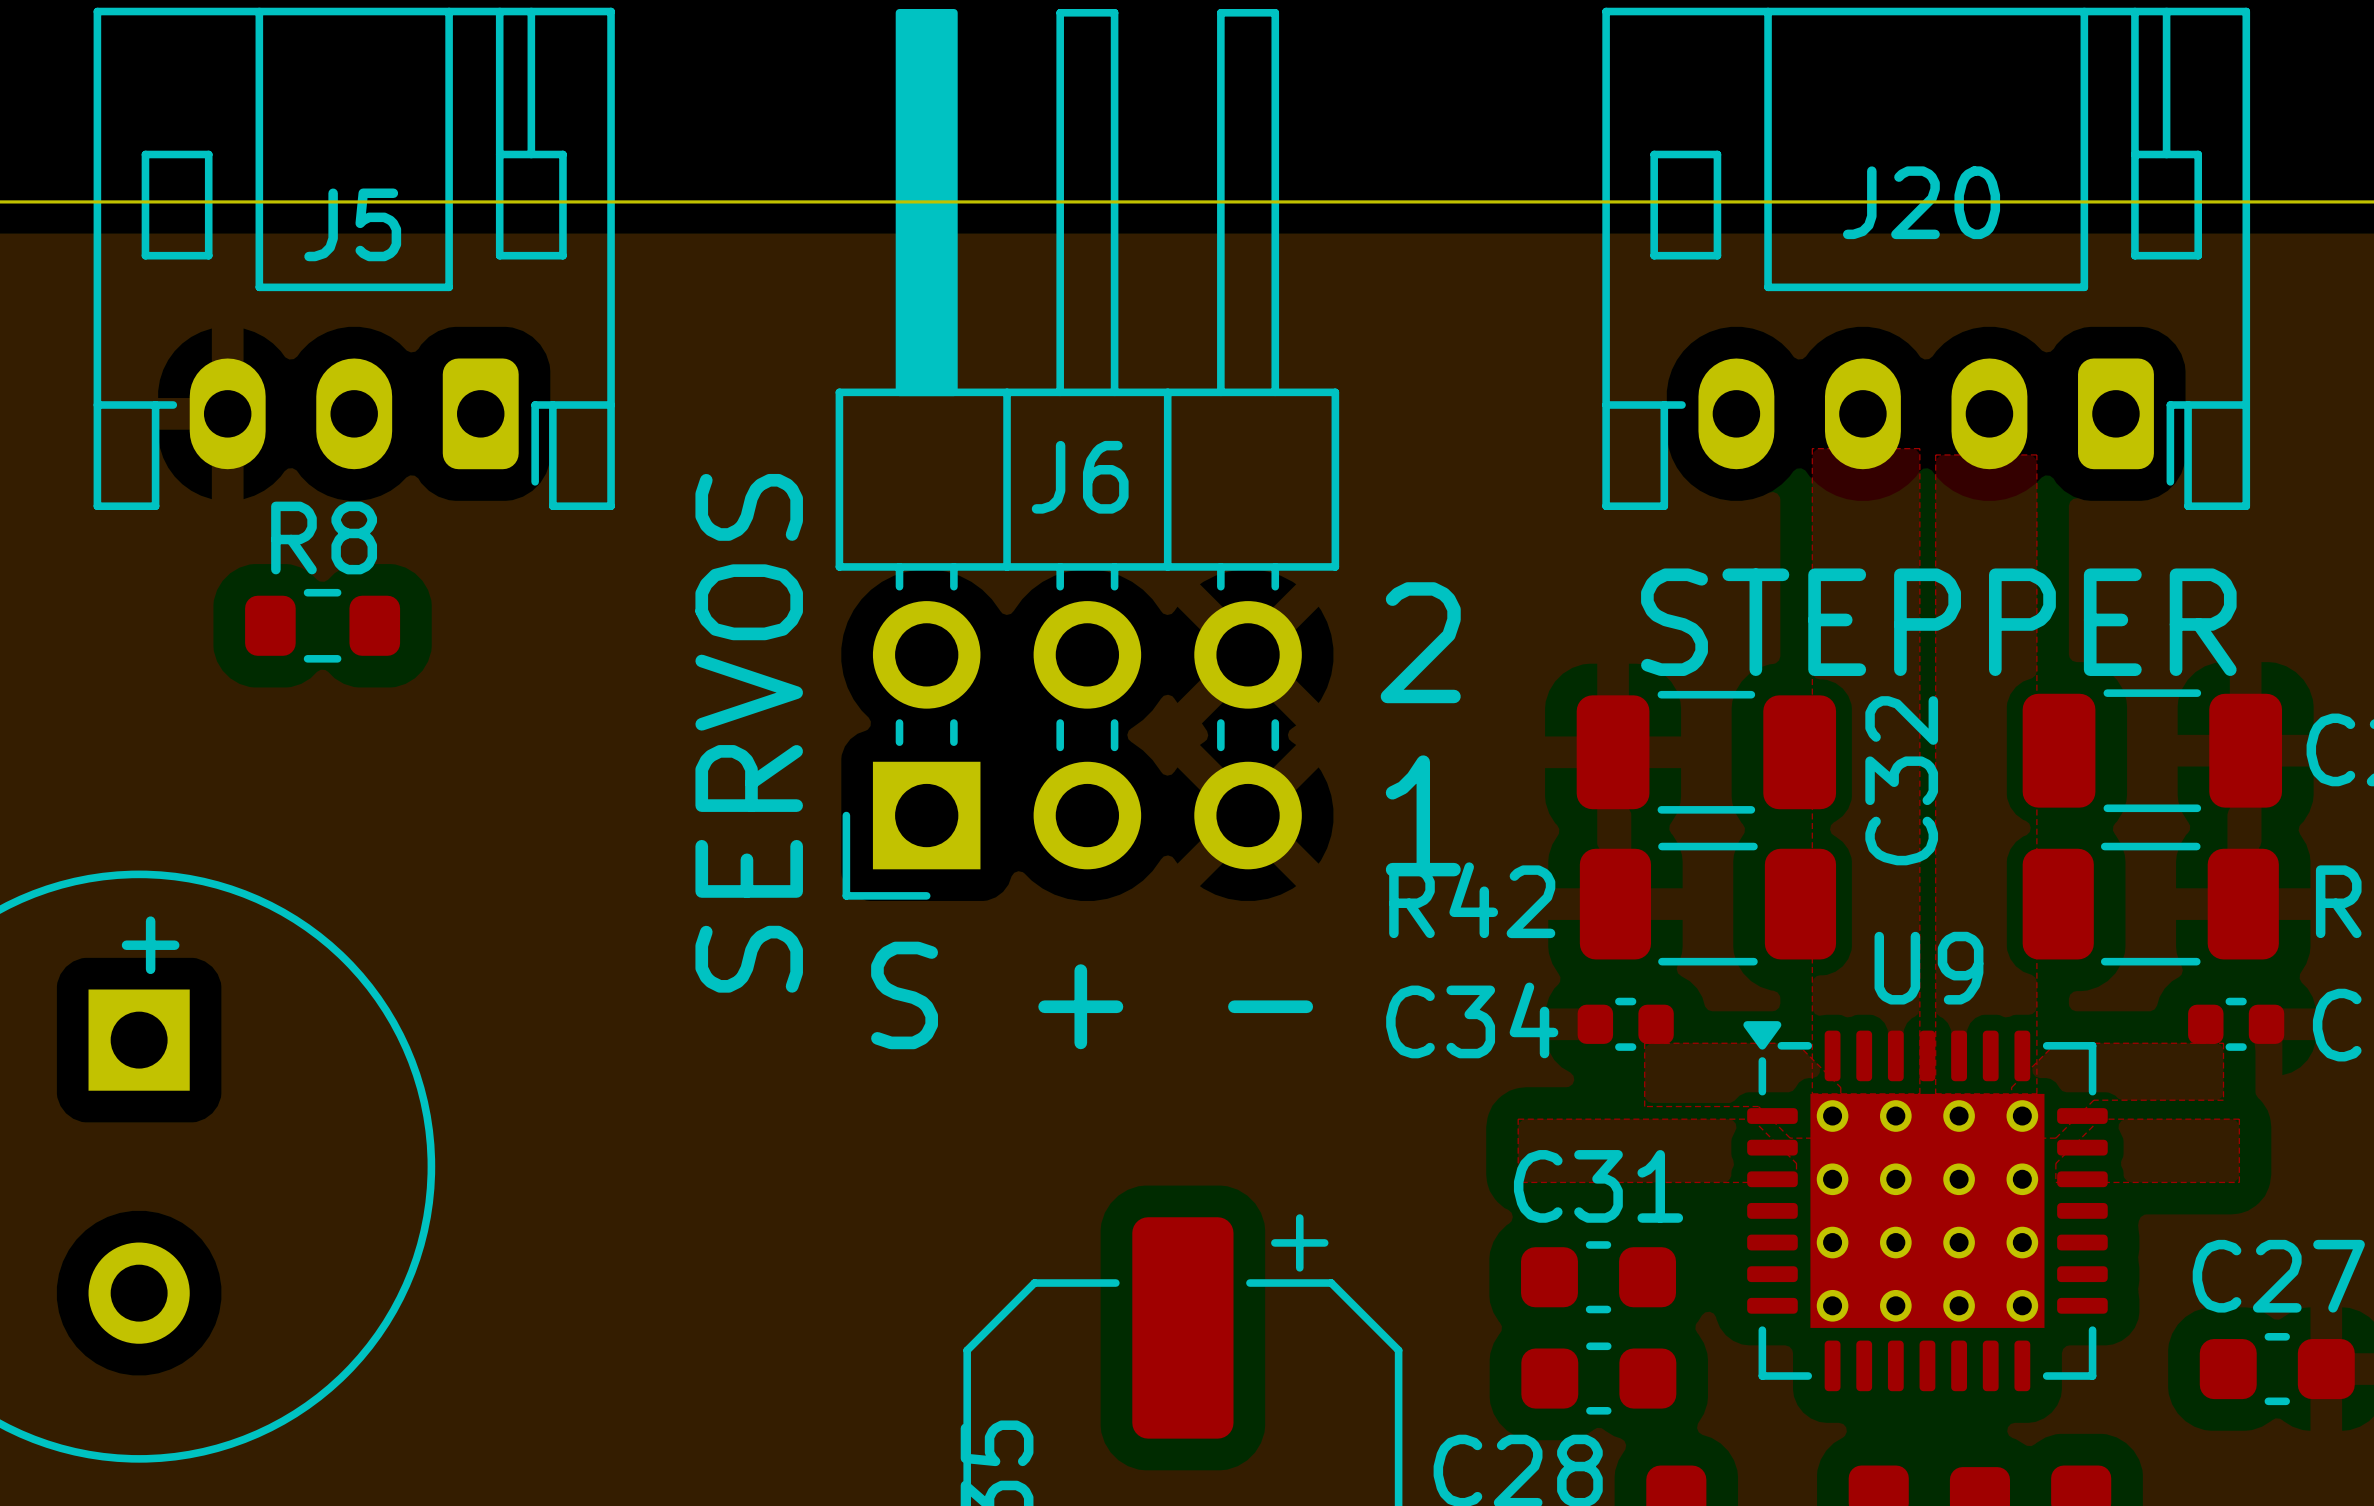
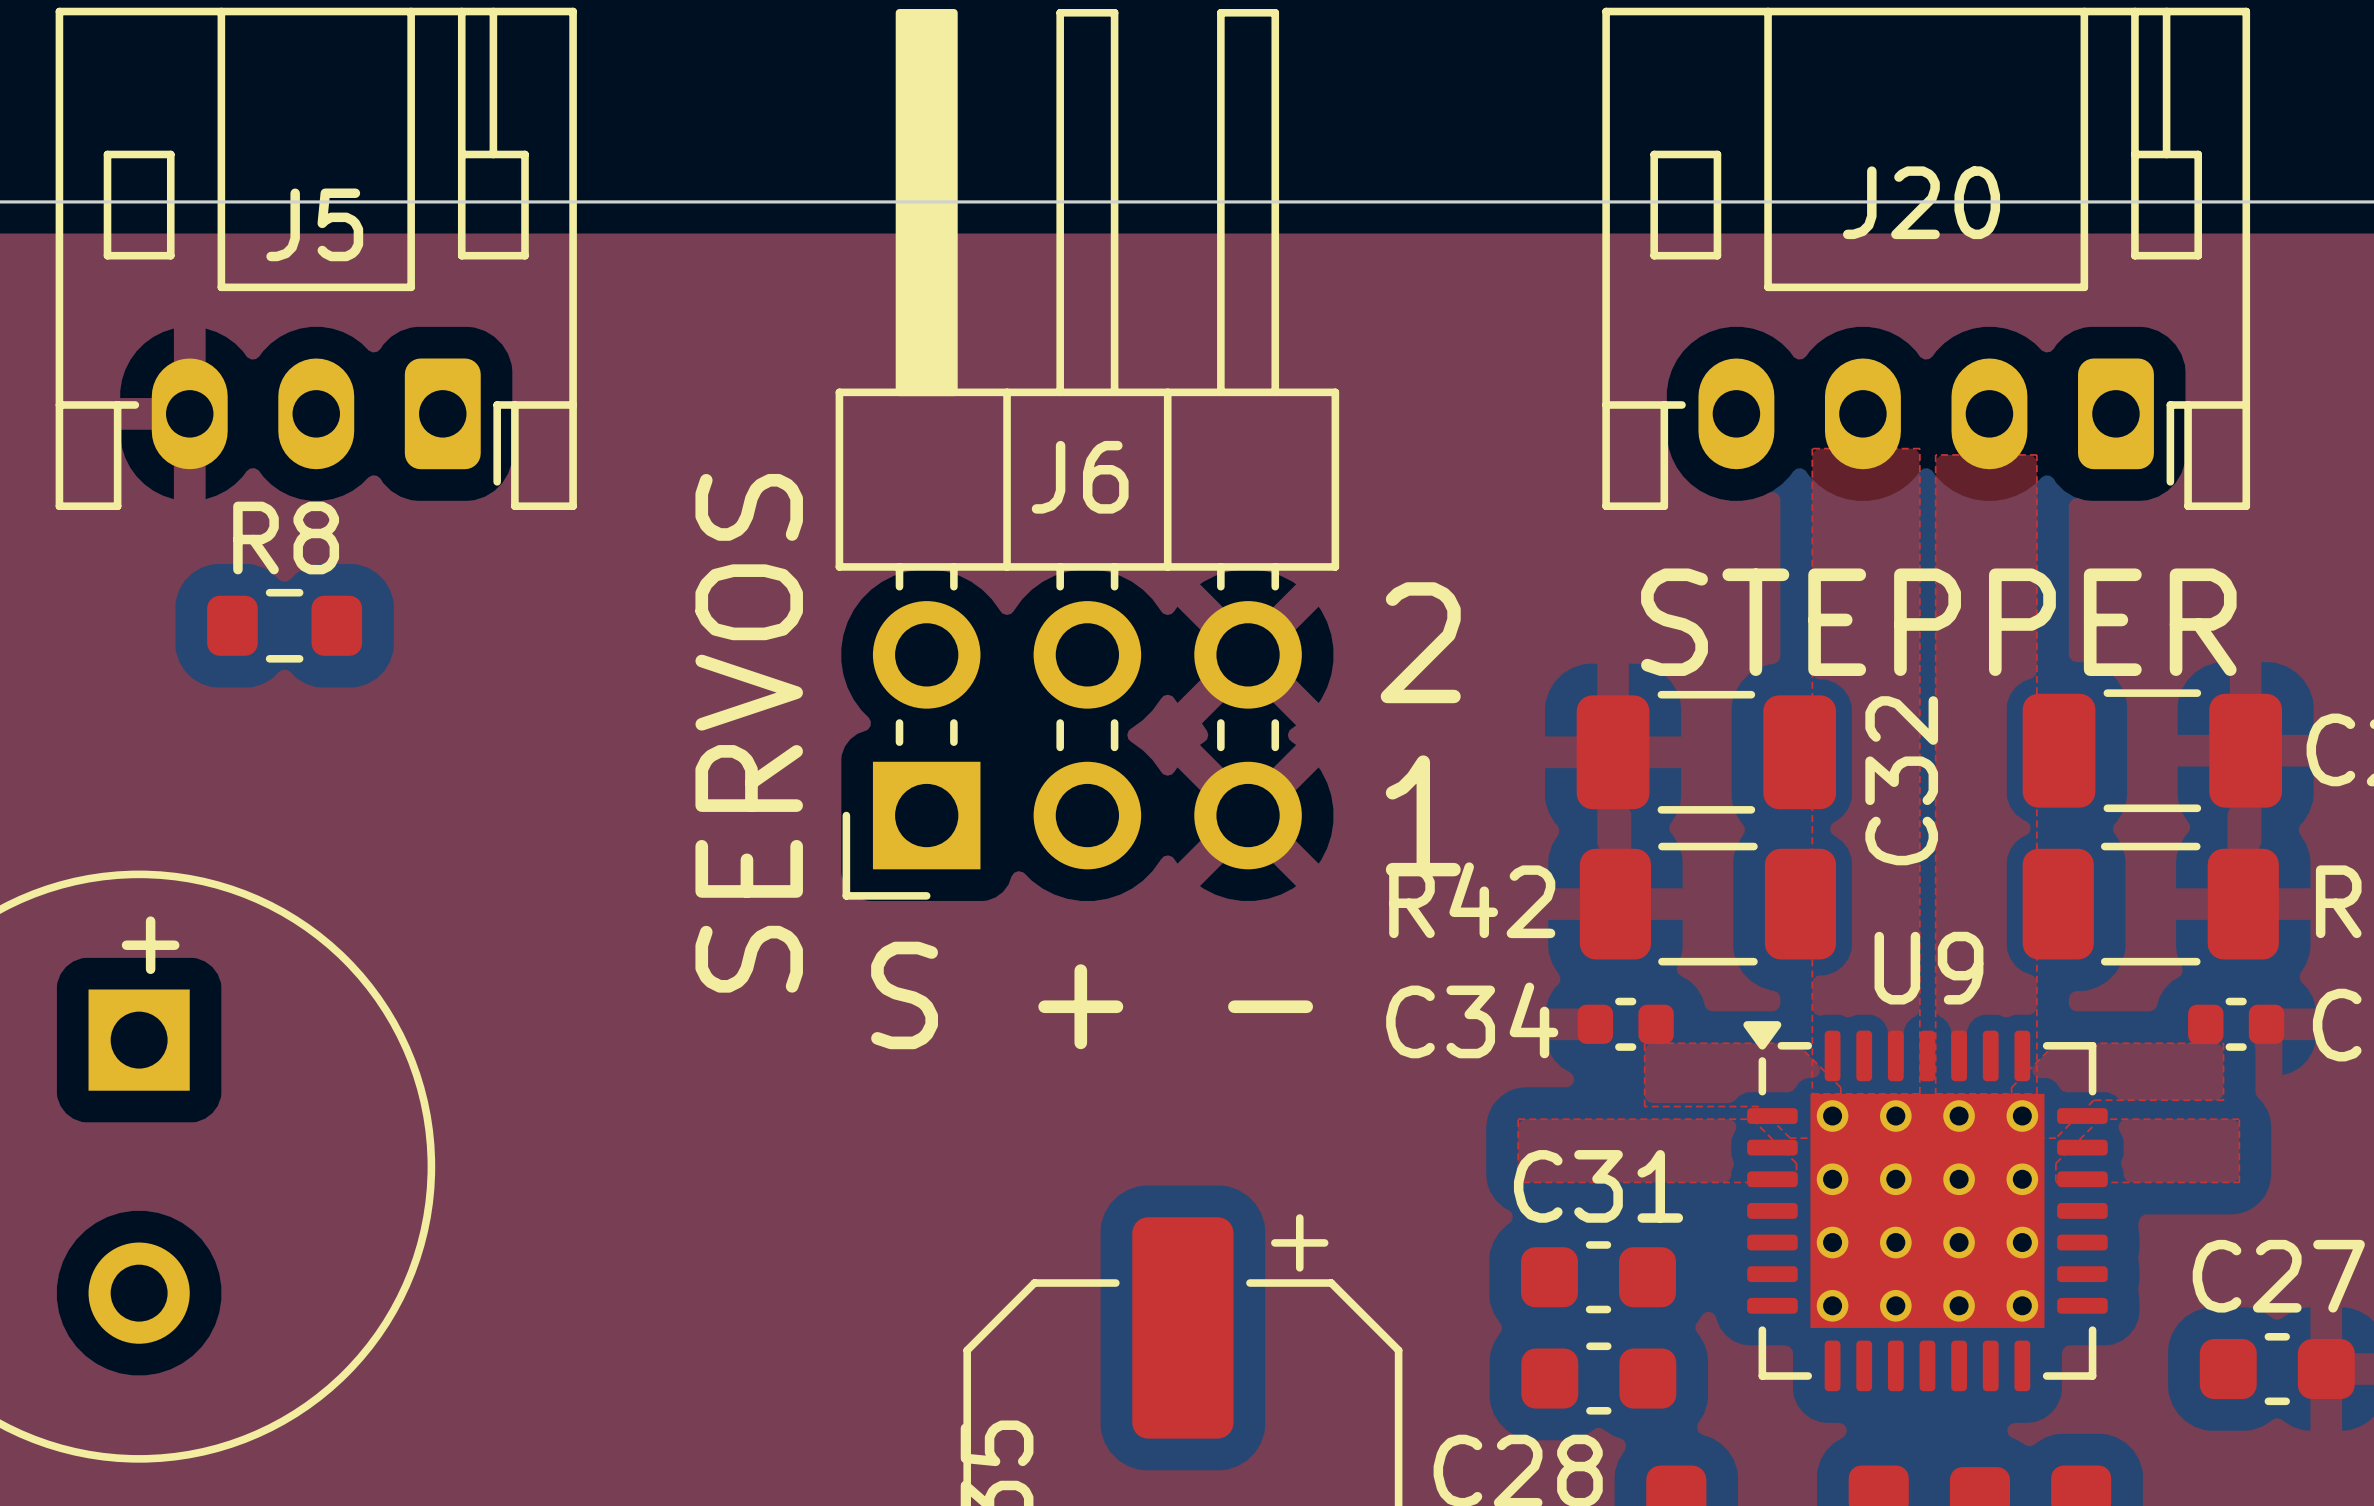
J5 position: (354, 258) -> (316, 258)
R8 position: (322, 625) -> (284, 625)

